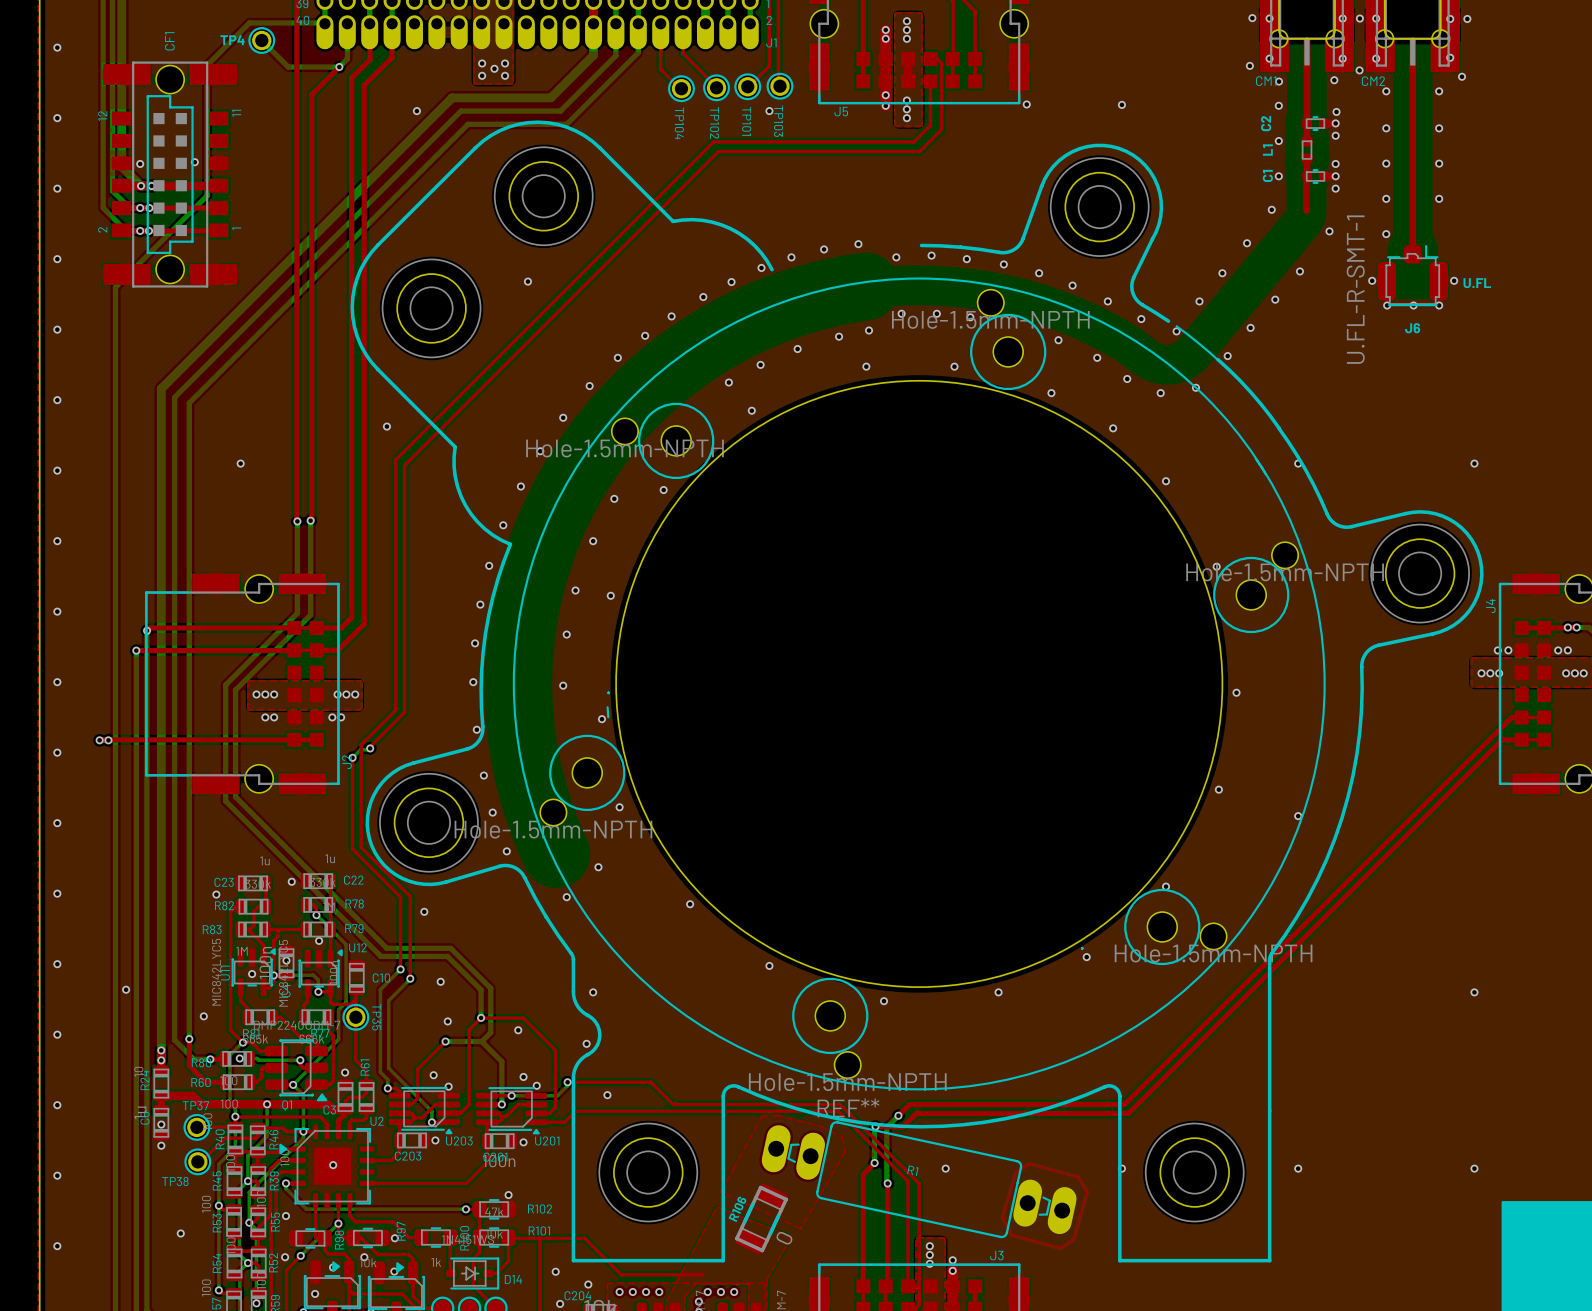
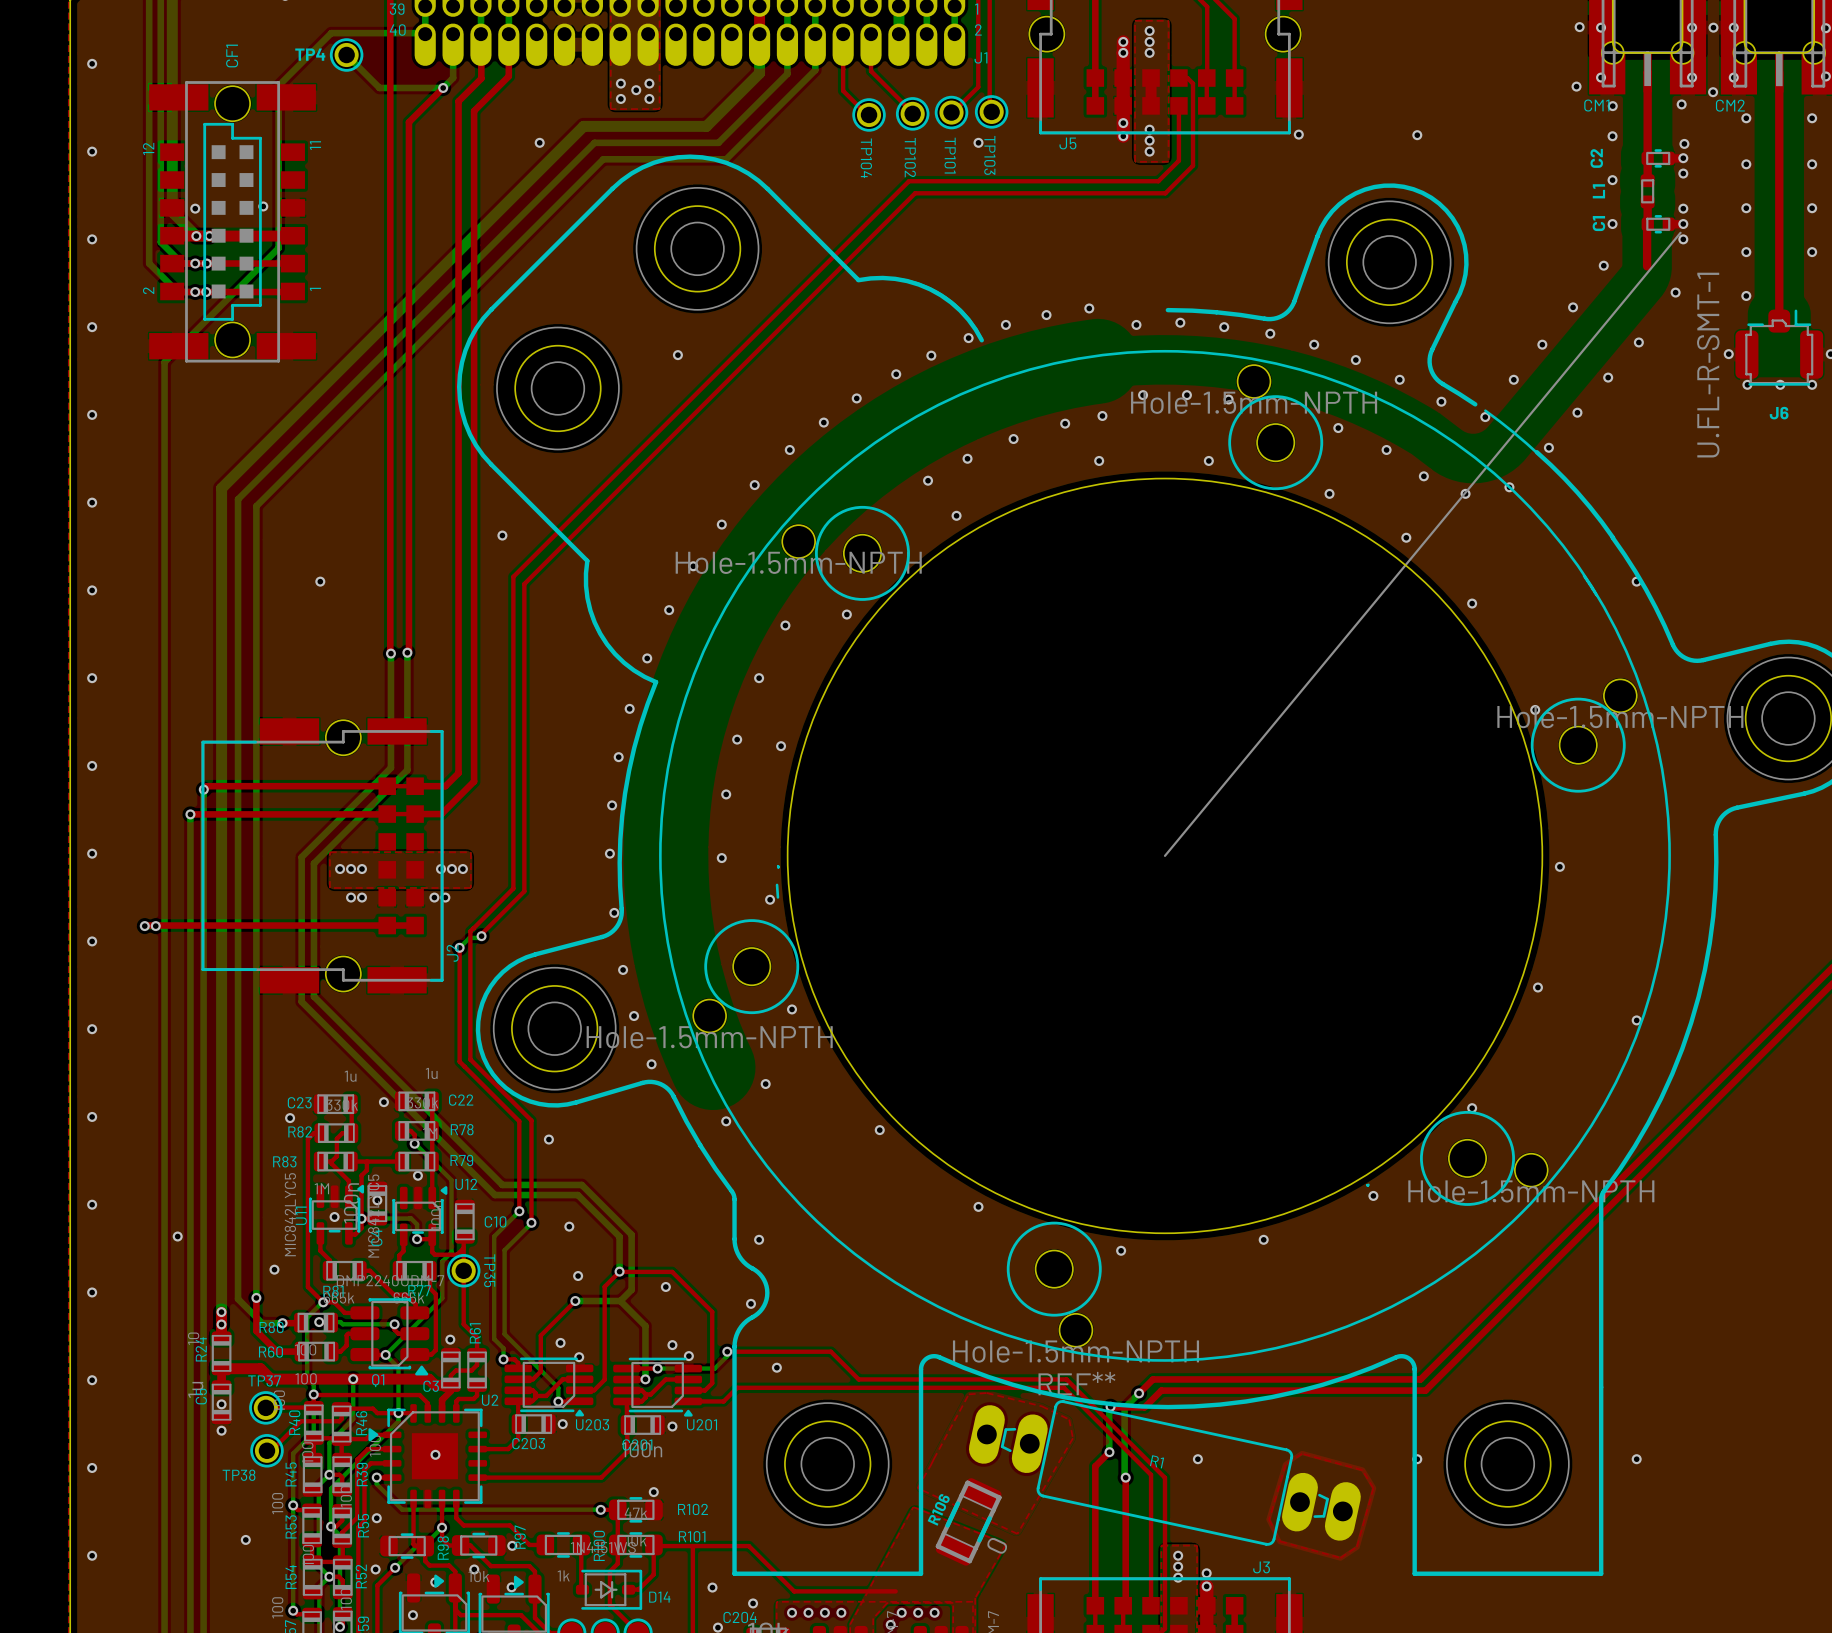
line: none -> (1680, 232) (1164, 855)

